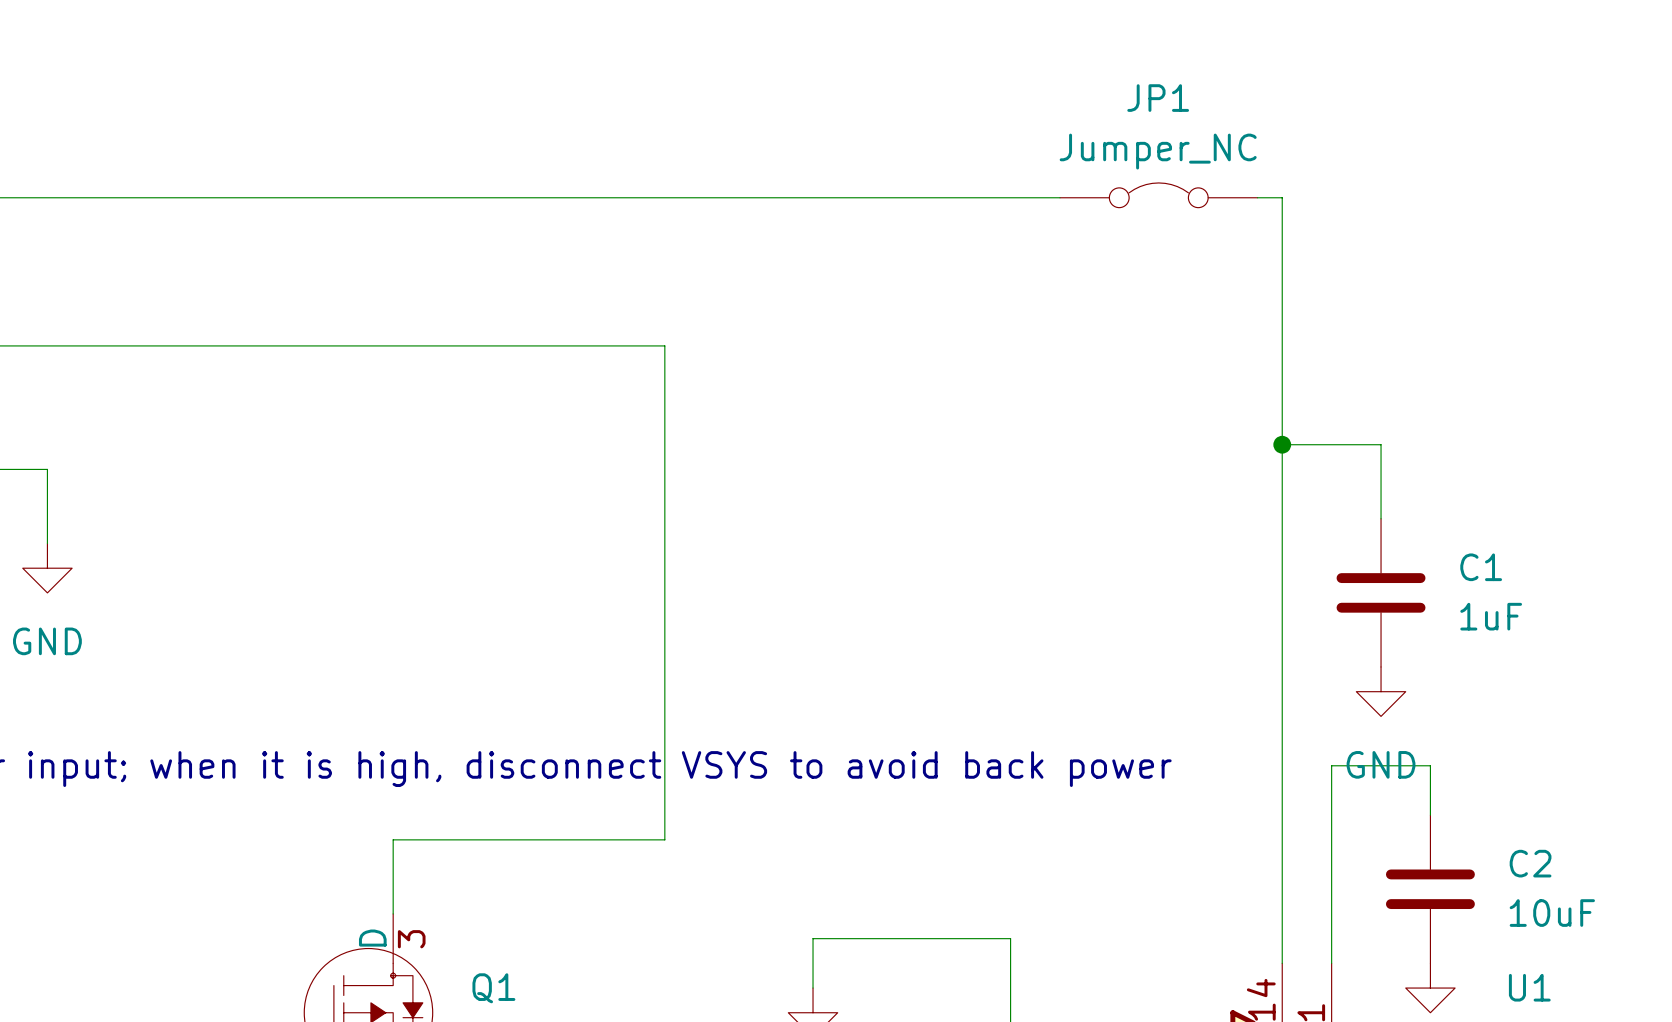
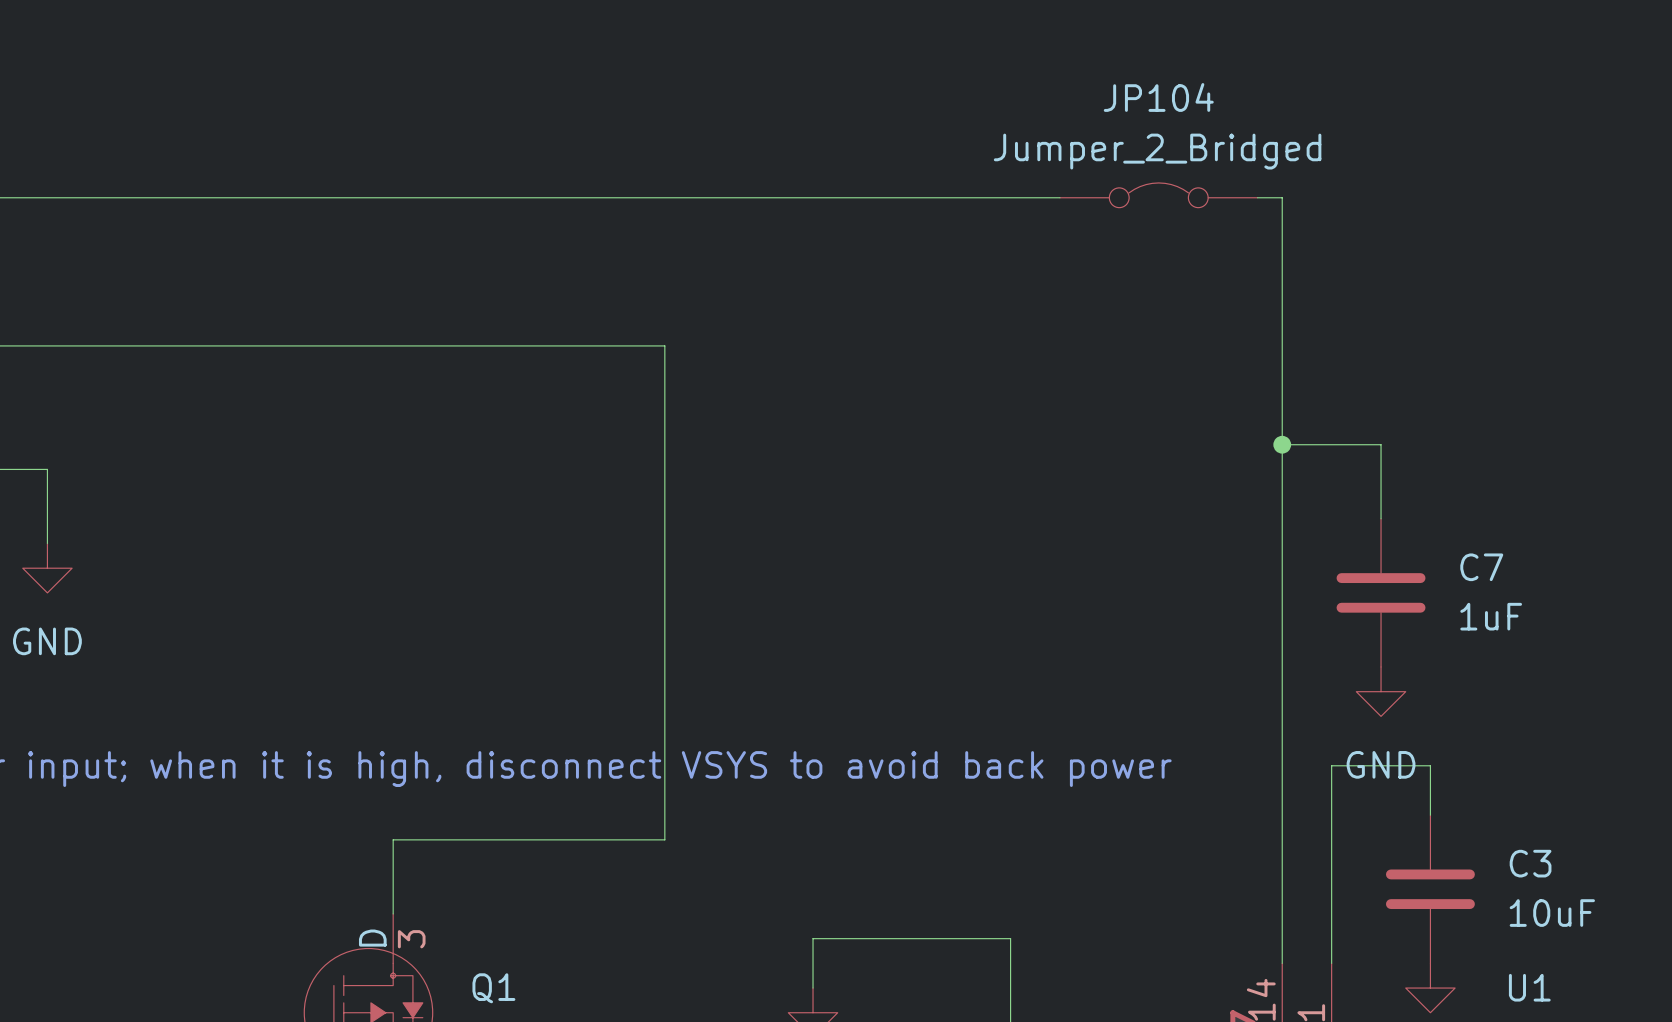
JP1 name: JP1 (1158, 98) -> JP104 (1158, 97)
JP1 value: Jumper_NC (1158, 151) -> Jumper_2_Bridged (1157, 151)
C1 name: C1 (1481, 567) -> C7 (1481, 567)
C2 name: C2 (1530, 863) -> C3 (1530, 863)

